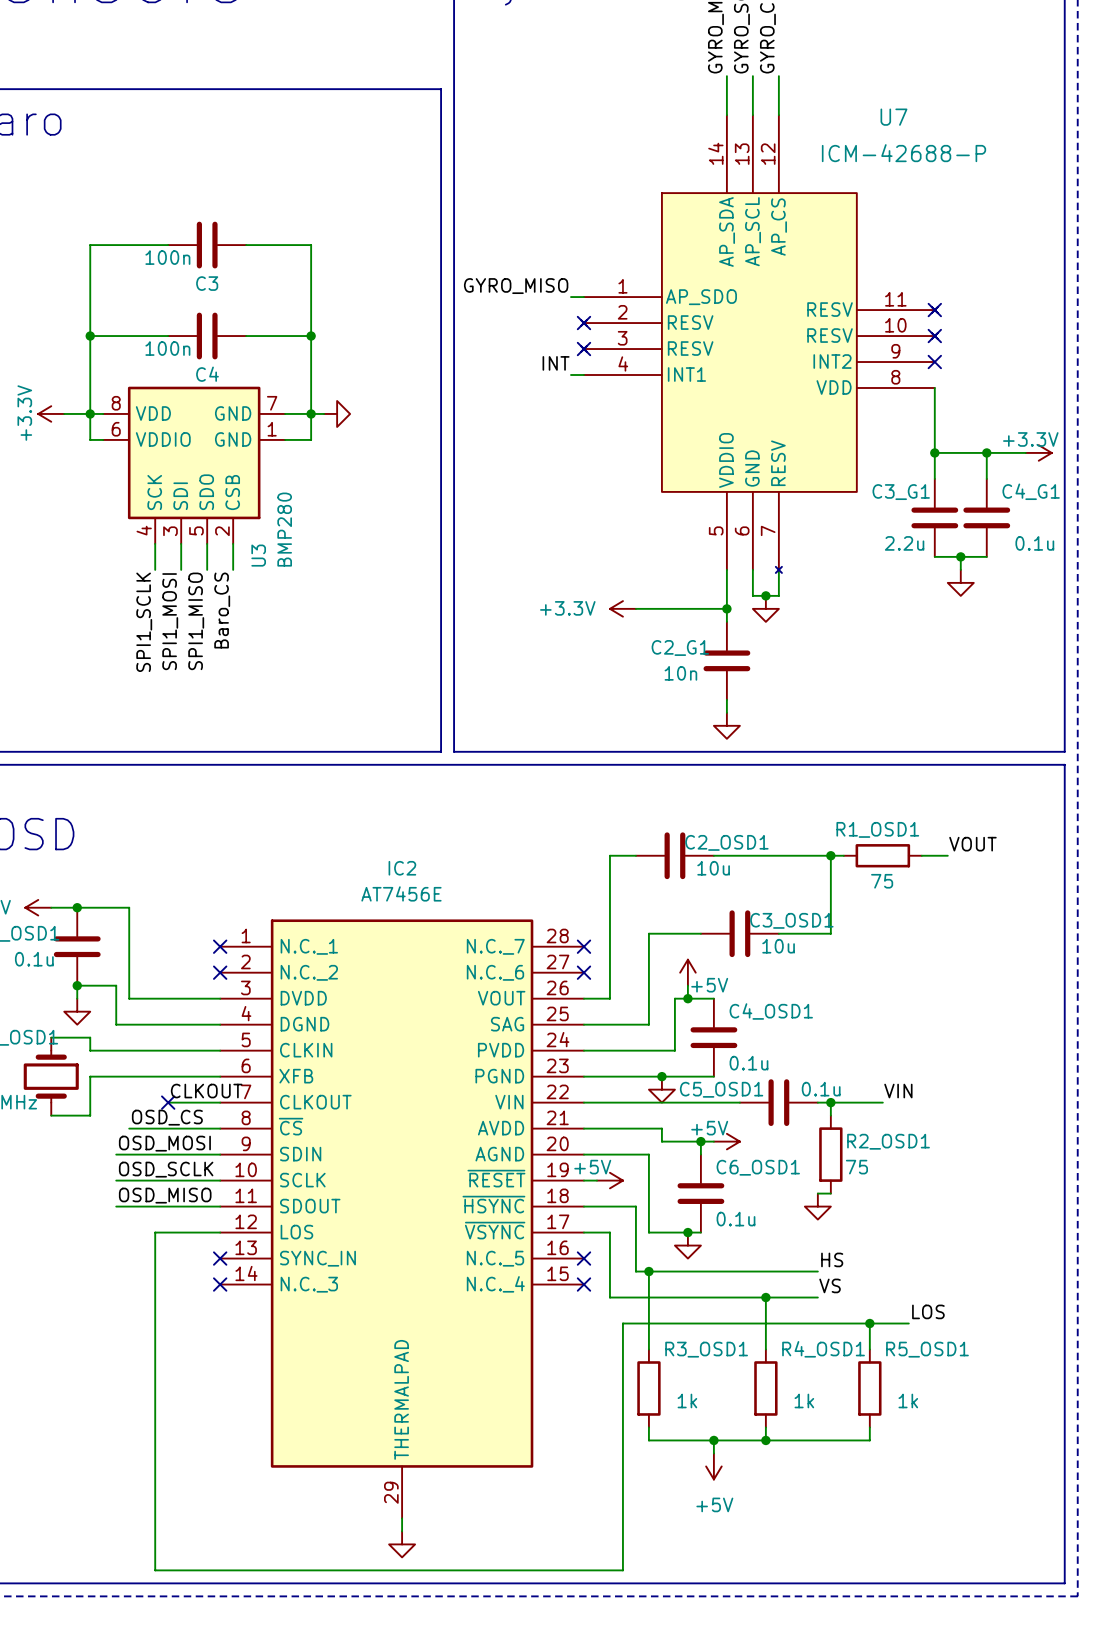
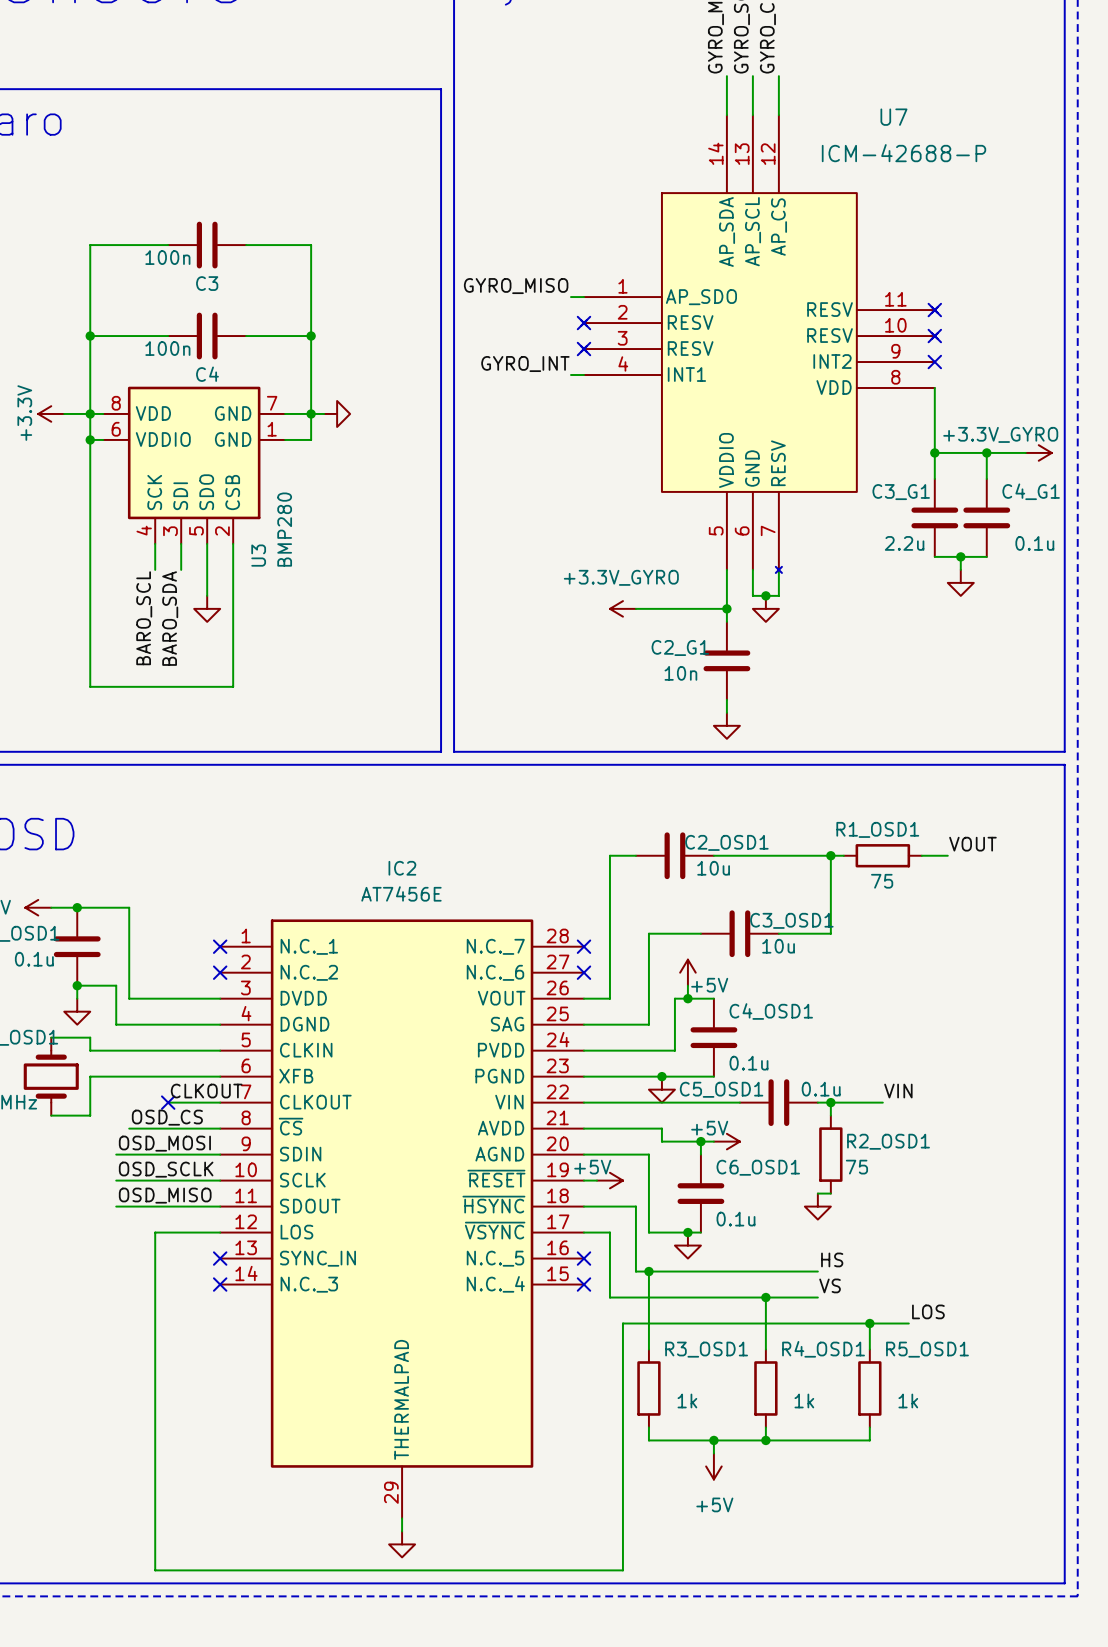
label: INT (556, 363) -> GYRO_INT (525, 364)
wire: none -> (90, 439) (90, 686) (233, 686) (233, 569)
junction: none -> (90, 439)
power symbol: +3.3V (1038, 452) -> +3.3V_GYRO (1038, 452)
wire: none -> (207, 569) (207, 595)
power symbol: none -> (207, 608)
power symbol: +3.3V (622, 608) -> +3.3V_GYRO (622, 608)
label: Baro_CS (222, 610) -> none
label: SPI1_MOSI (170, 621) -> BARO_SDA (170, 618)
label: SPI1_MISO (196, 621) -> none
label: SPI1_SCLK (144, 622) -> BARO_SCL (144, 618)

